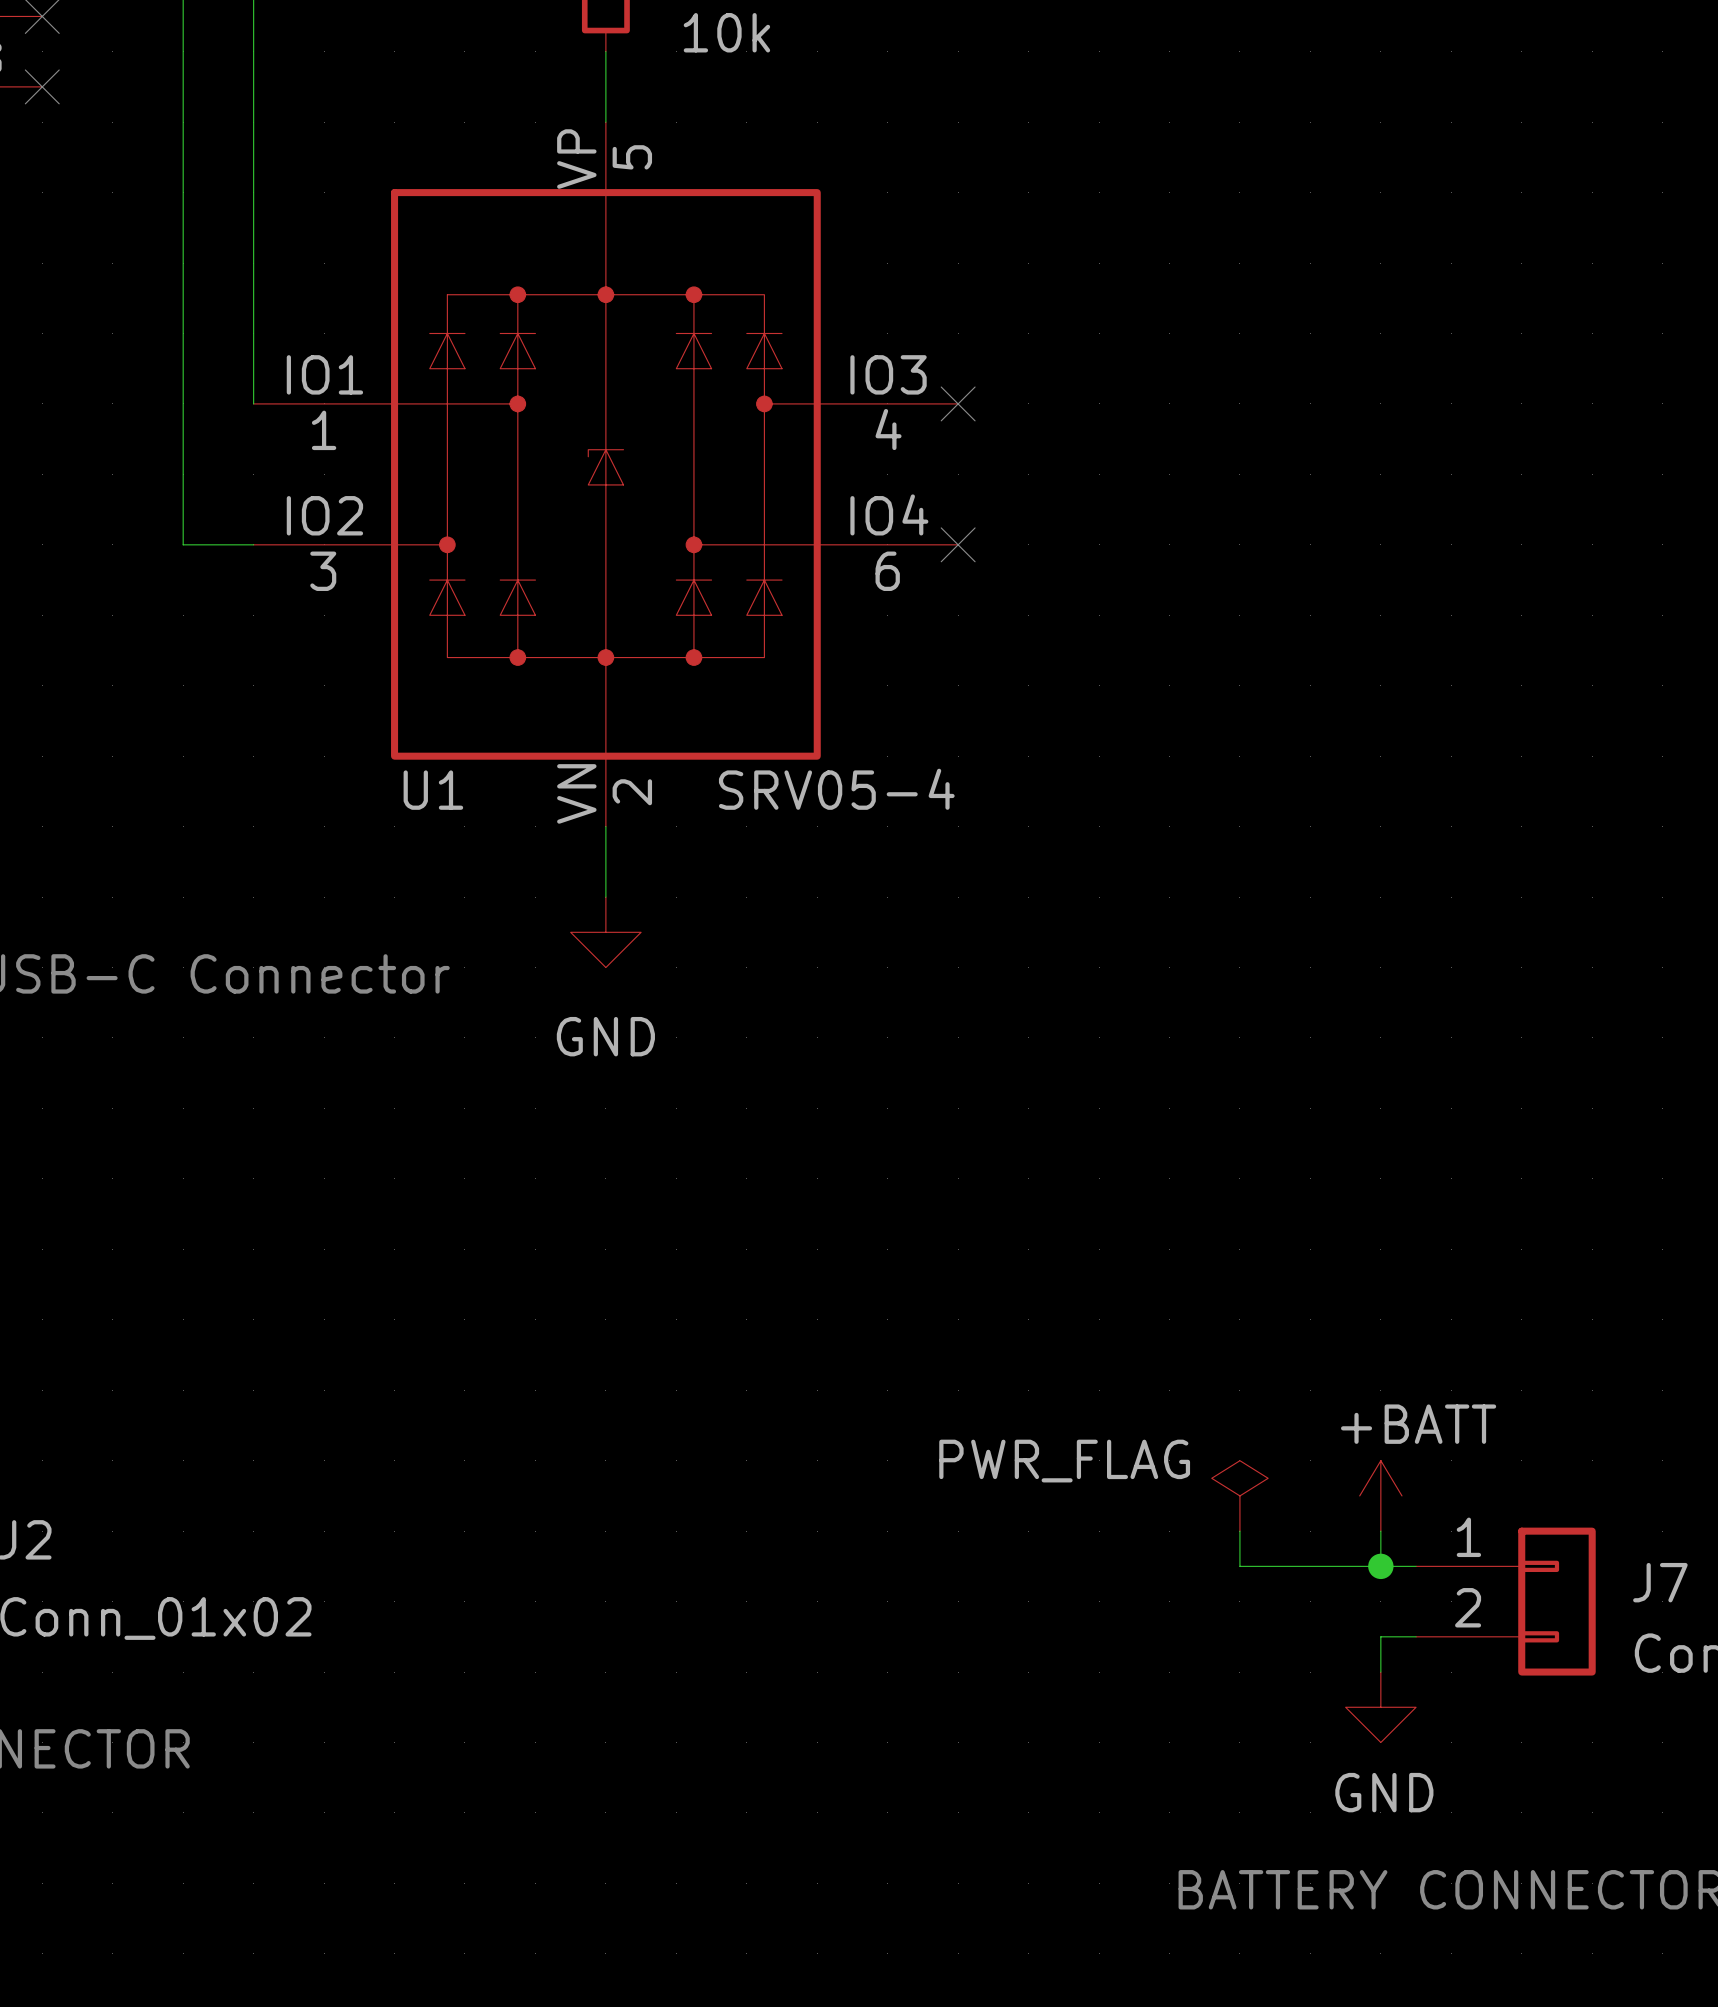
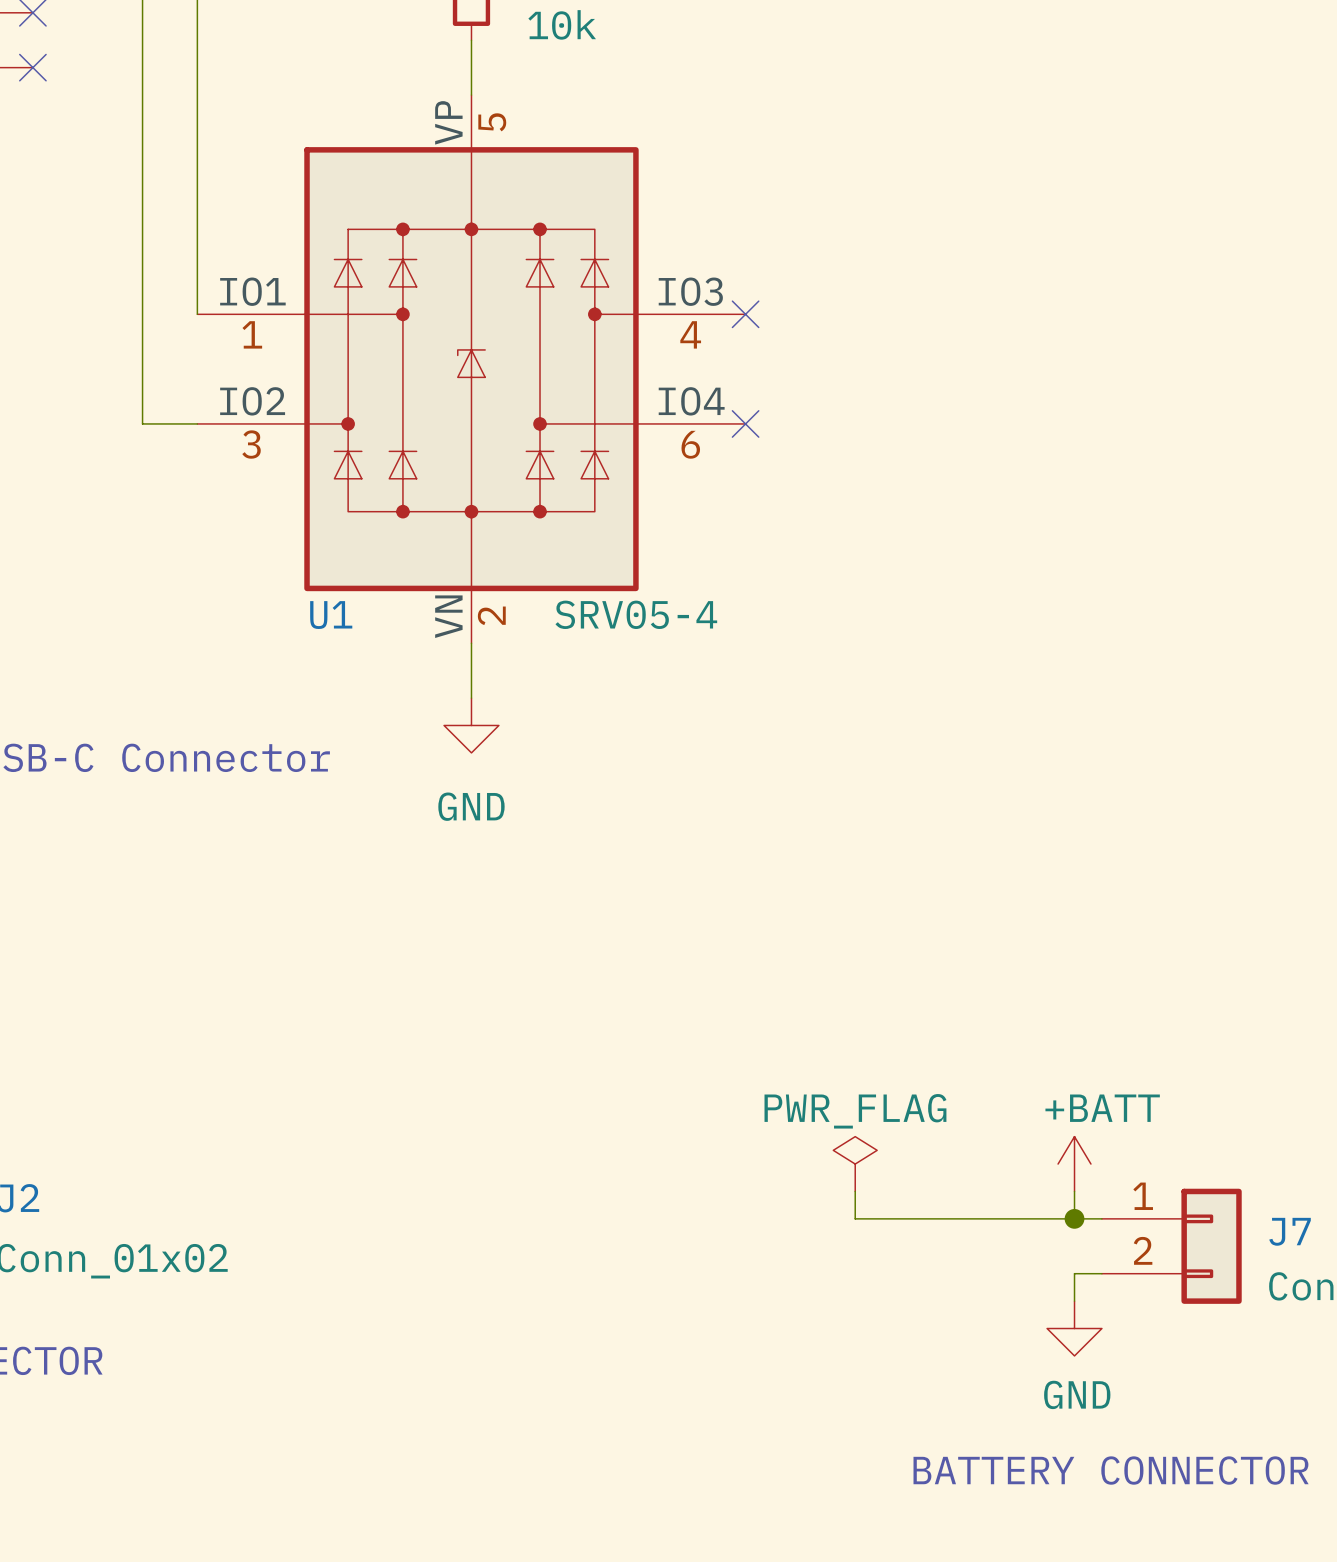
power symbol text position: PWR_FLAG (1064, 1461) -> PWR_FLAG (855, 1111)
power symbol position: PWR_FLAG (1239, 1495) -> PWR_FLAG (855, 1164)
wire: (1239, 1531) (1239, 1566) -> (855, 1191) (855, 1218) (964, 1218)

